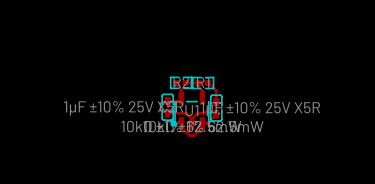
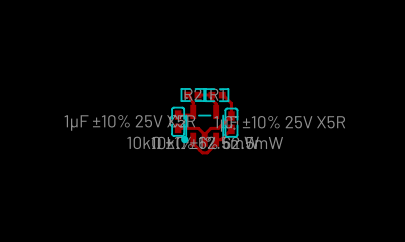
U1 name: U1 (191, 110) -> none

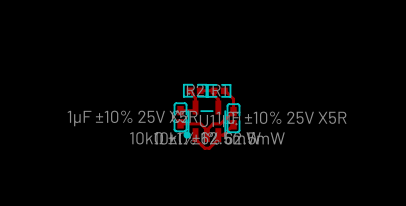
U1 name: none -> U1 (206, 120)

